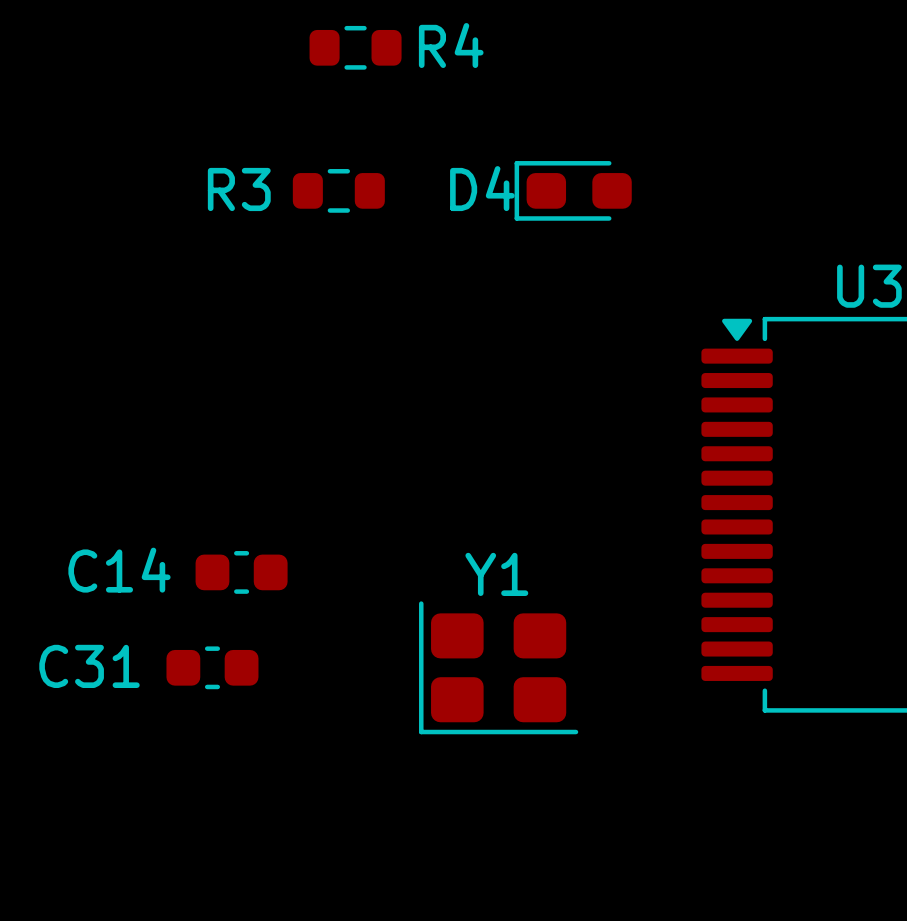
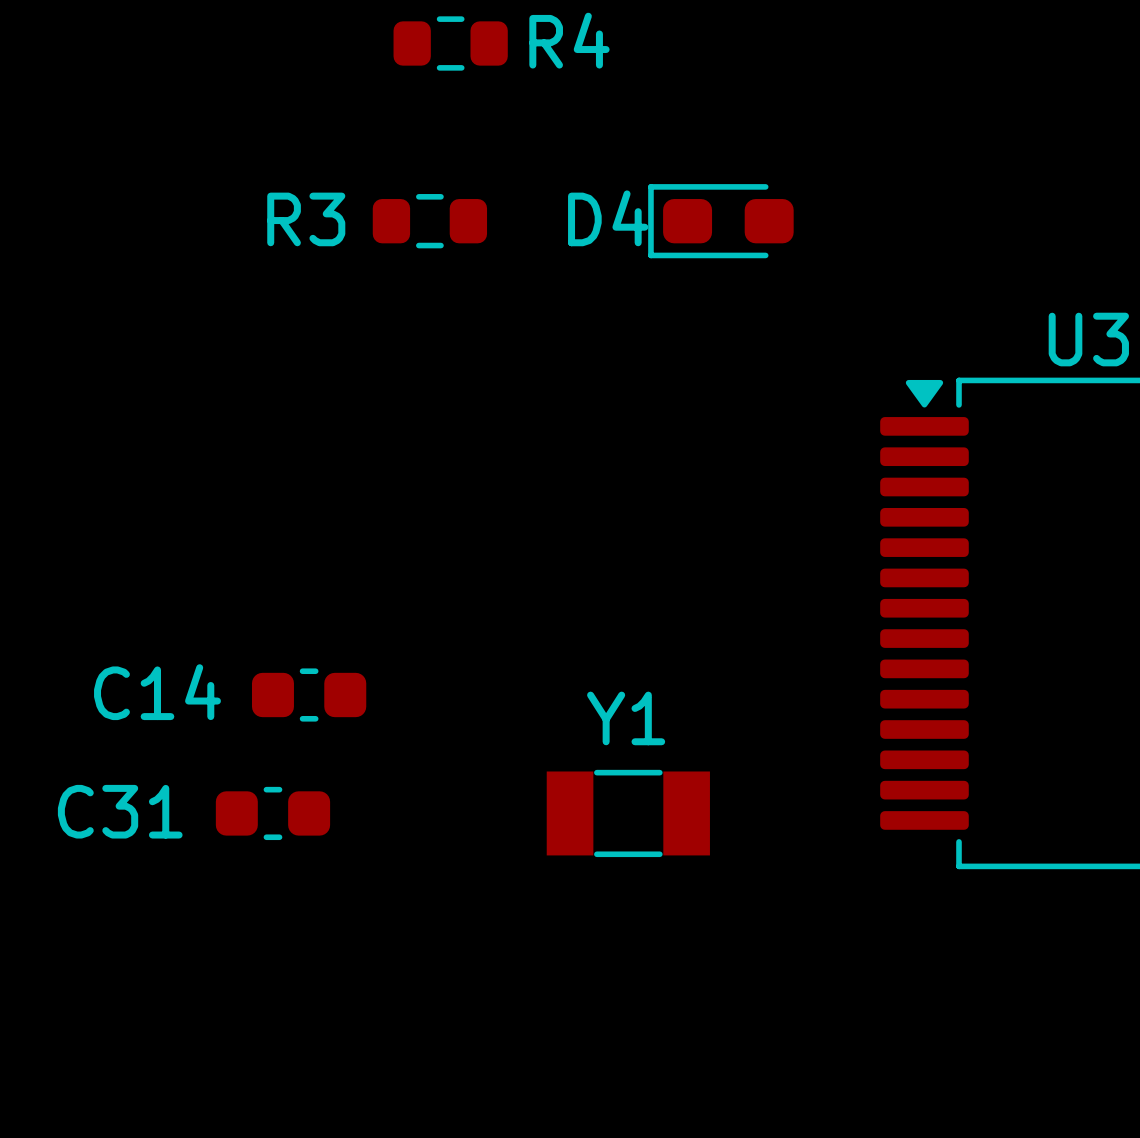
Y1 footprint: [419, 601, 579, 735] -> [546, 769, 710, 858]

